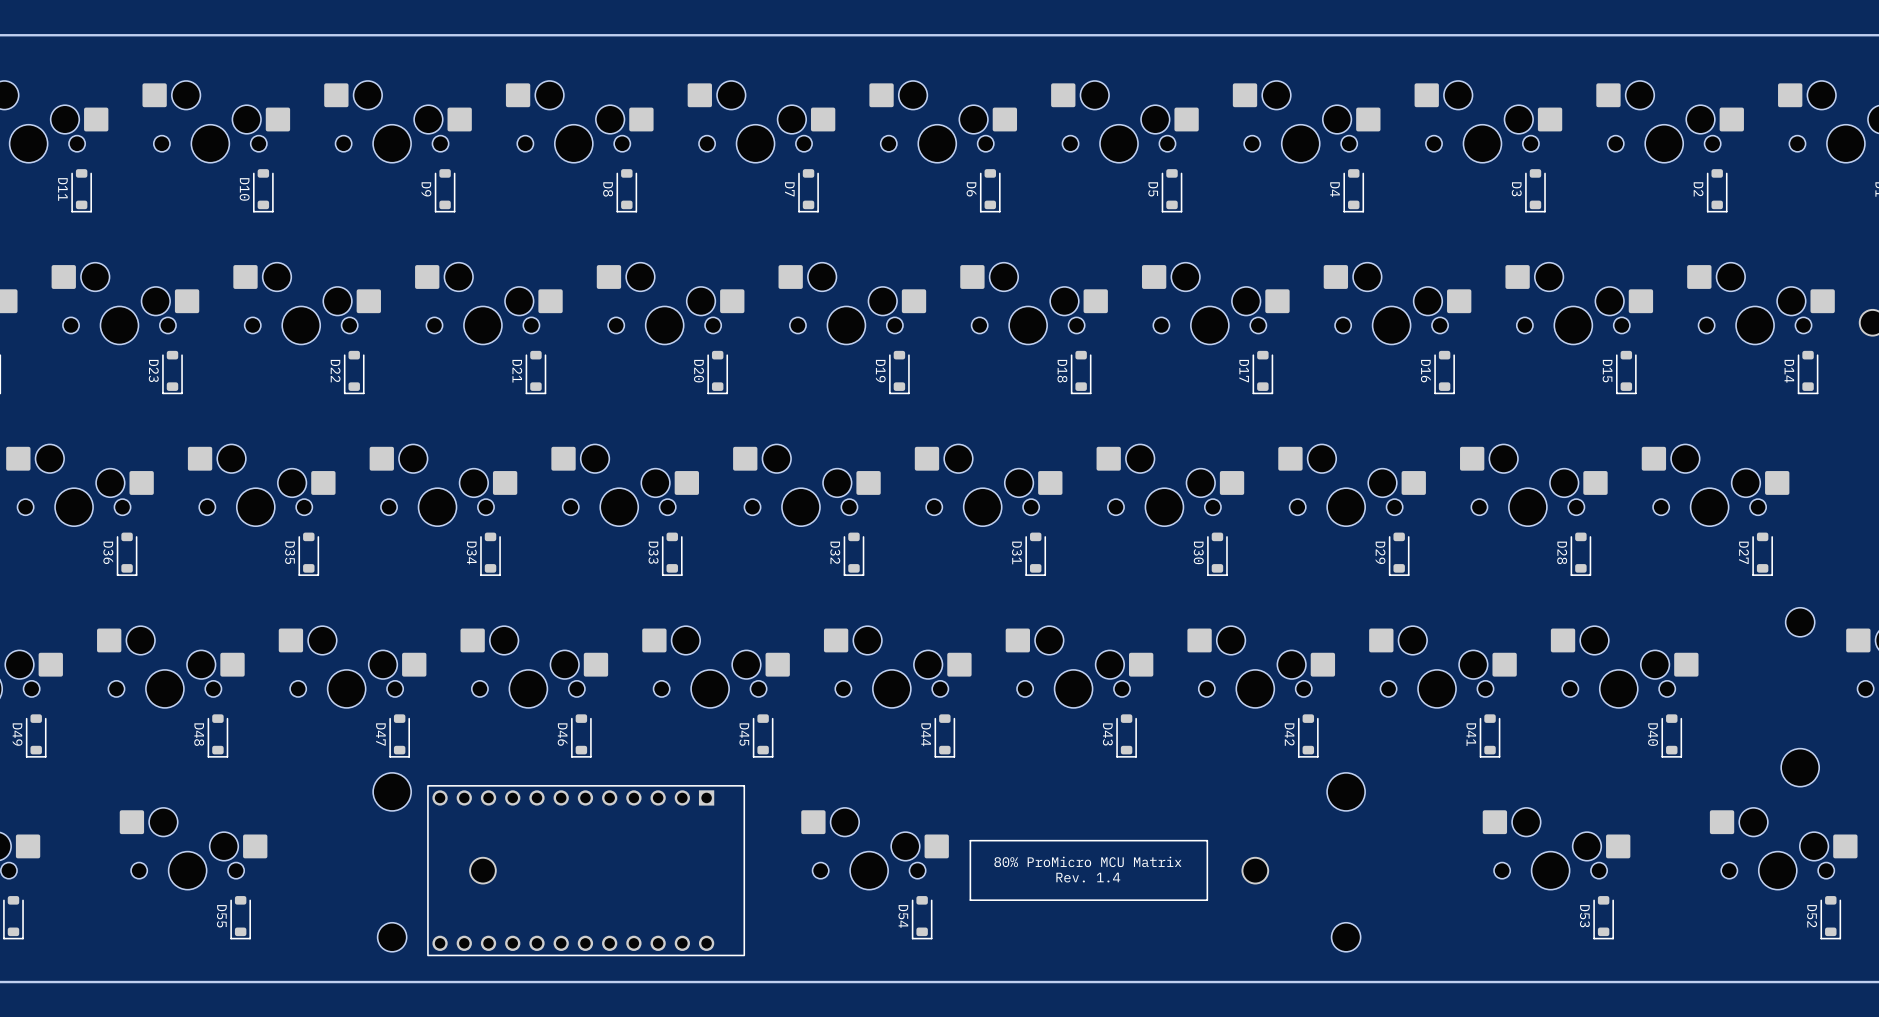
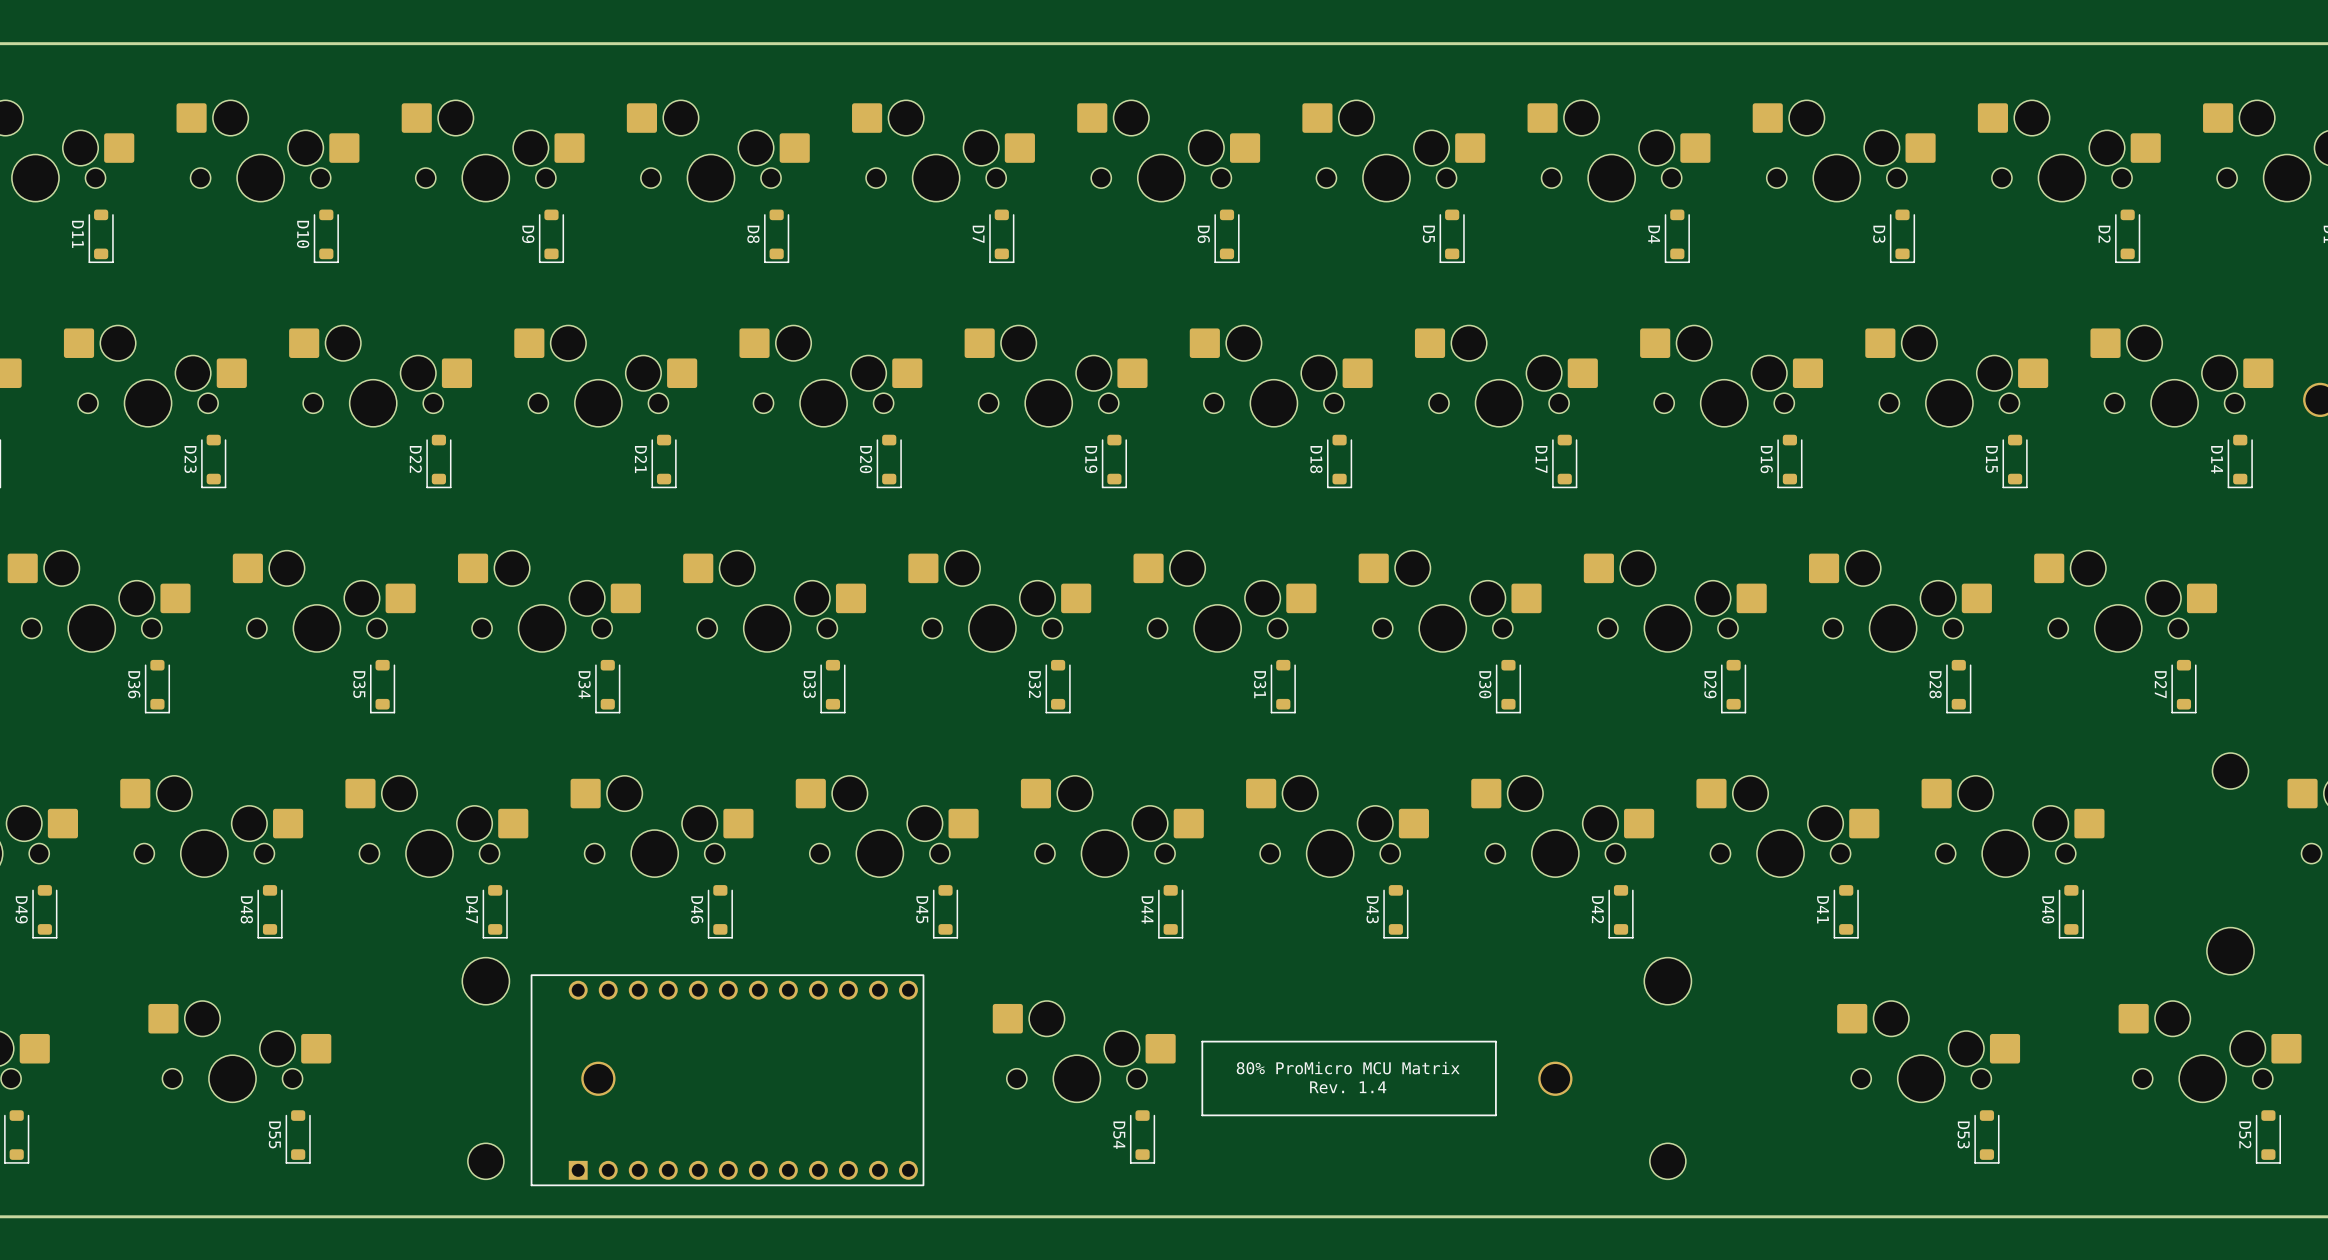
part rotation: 0° (586, 870) -> 180° (727, 1080)

